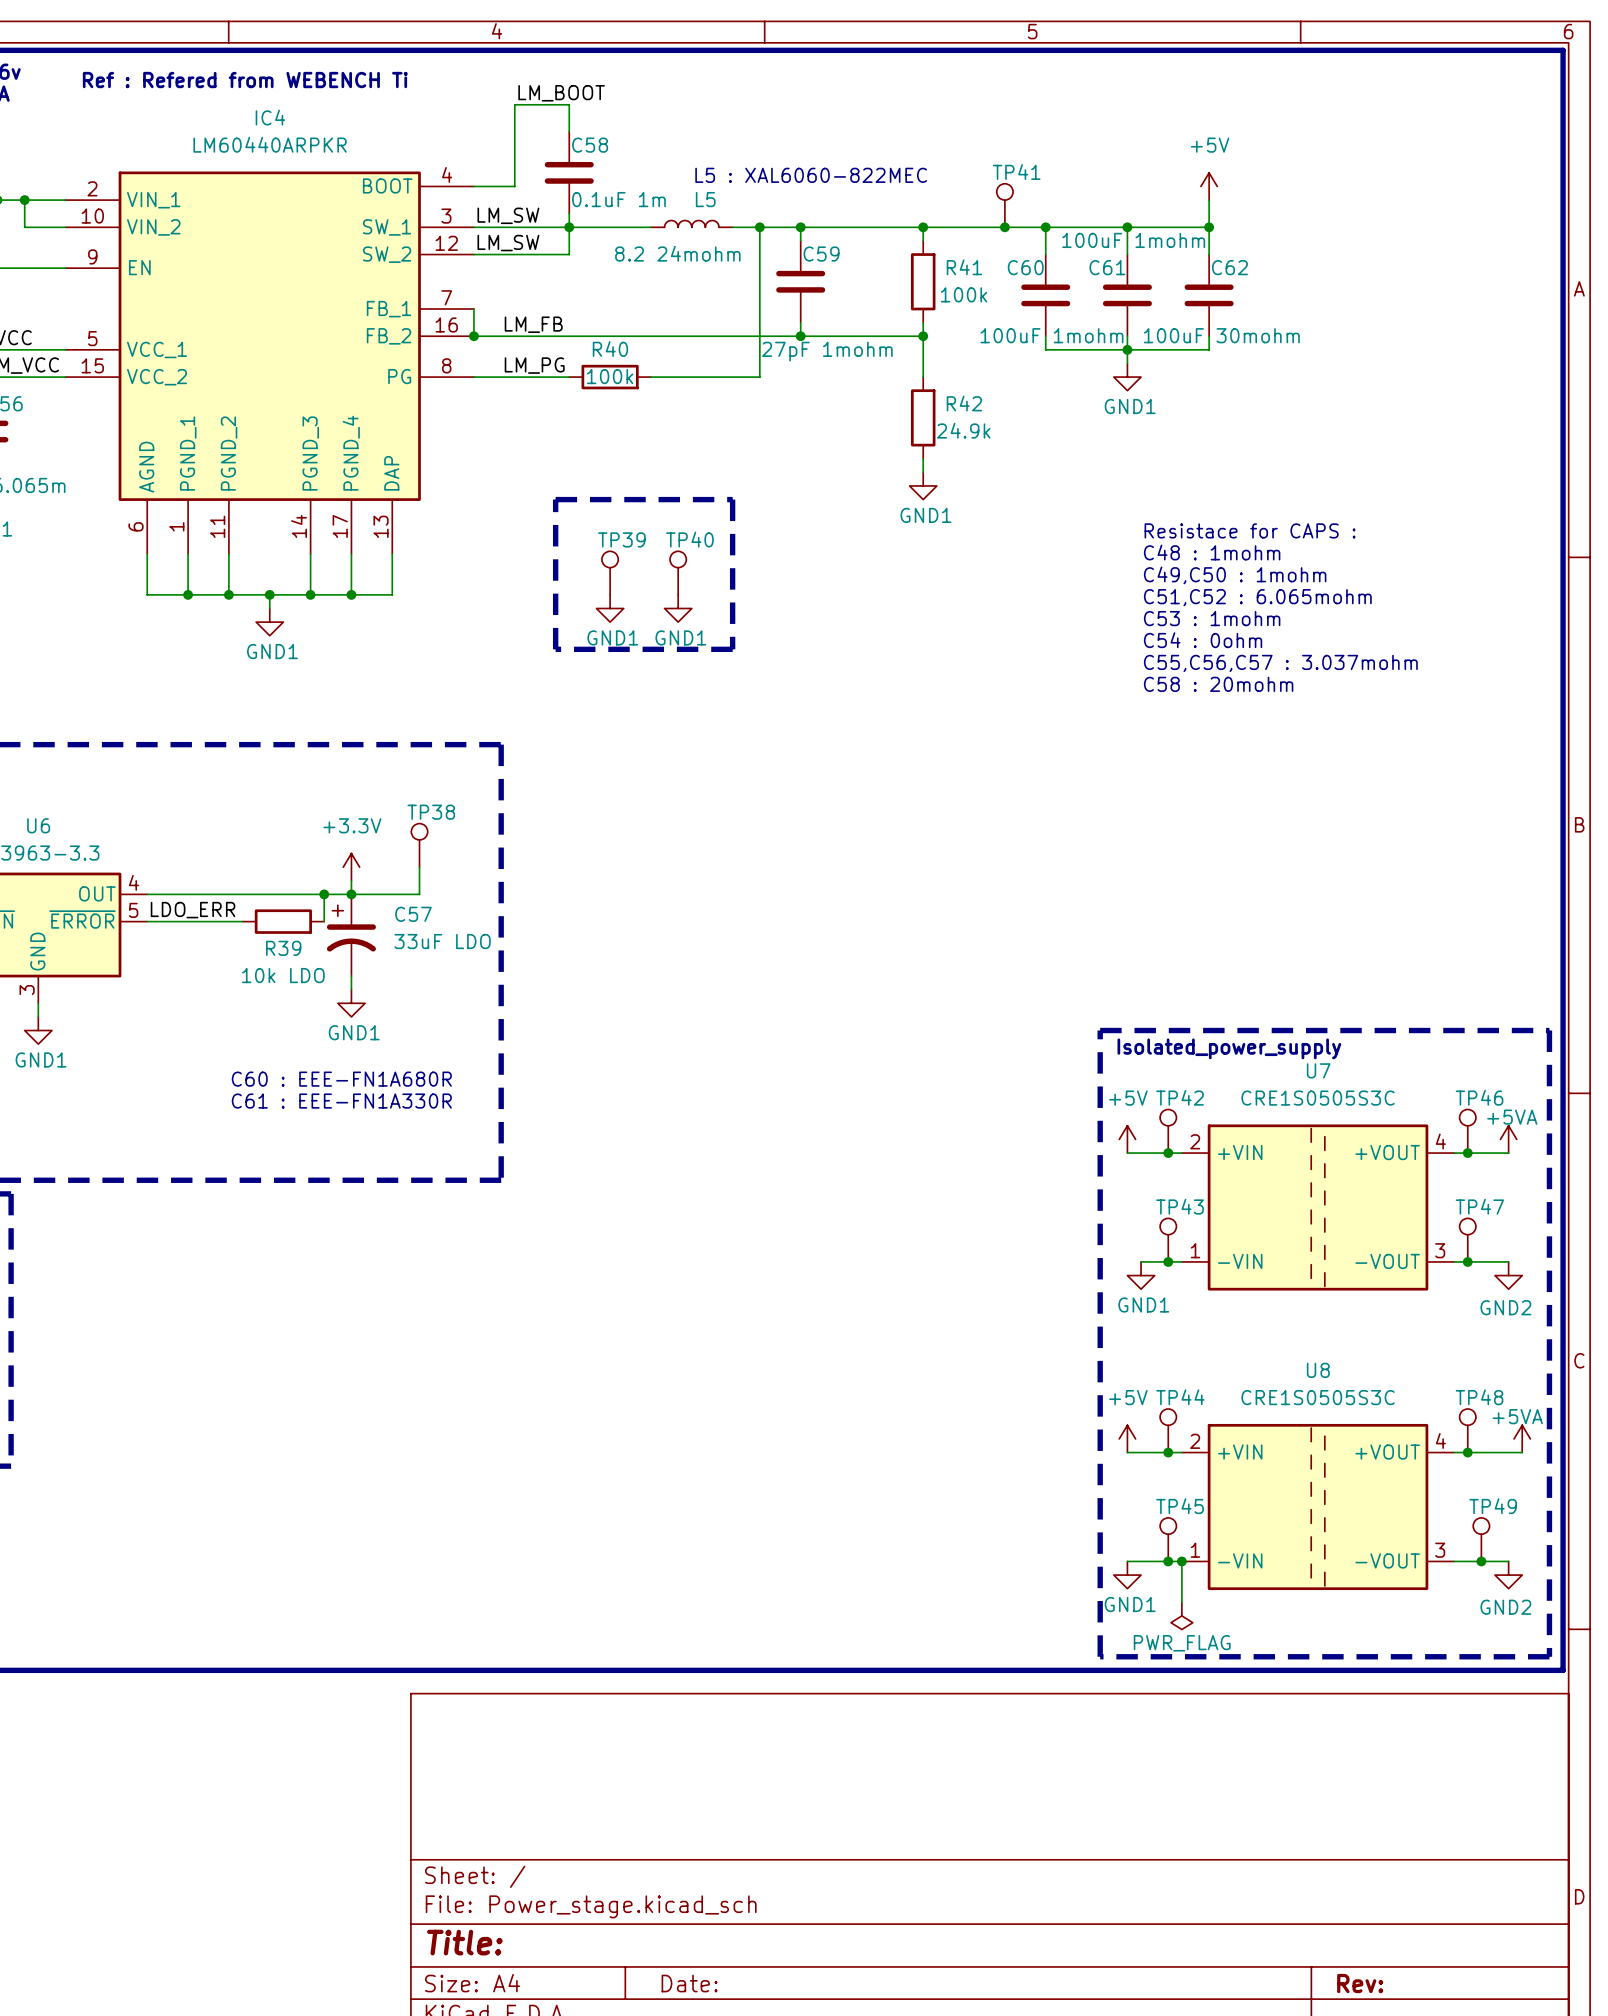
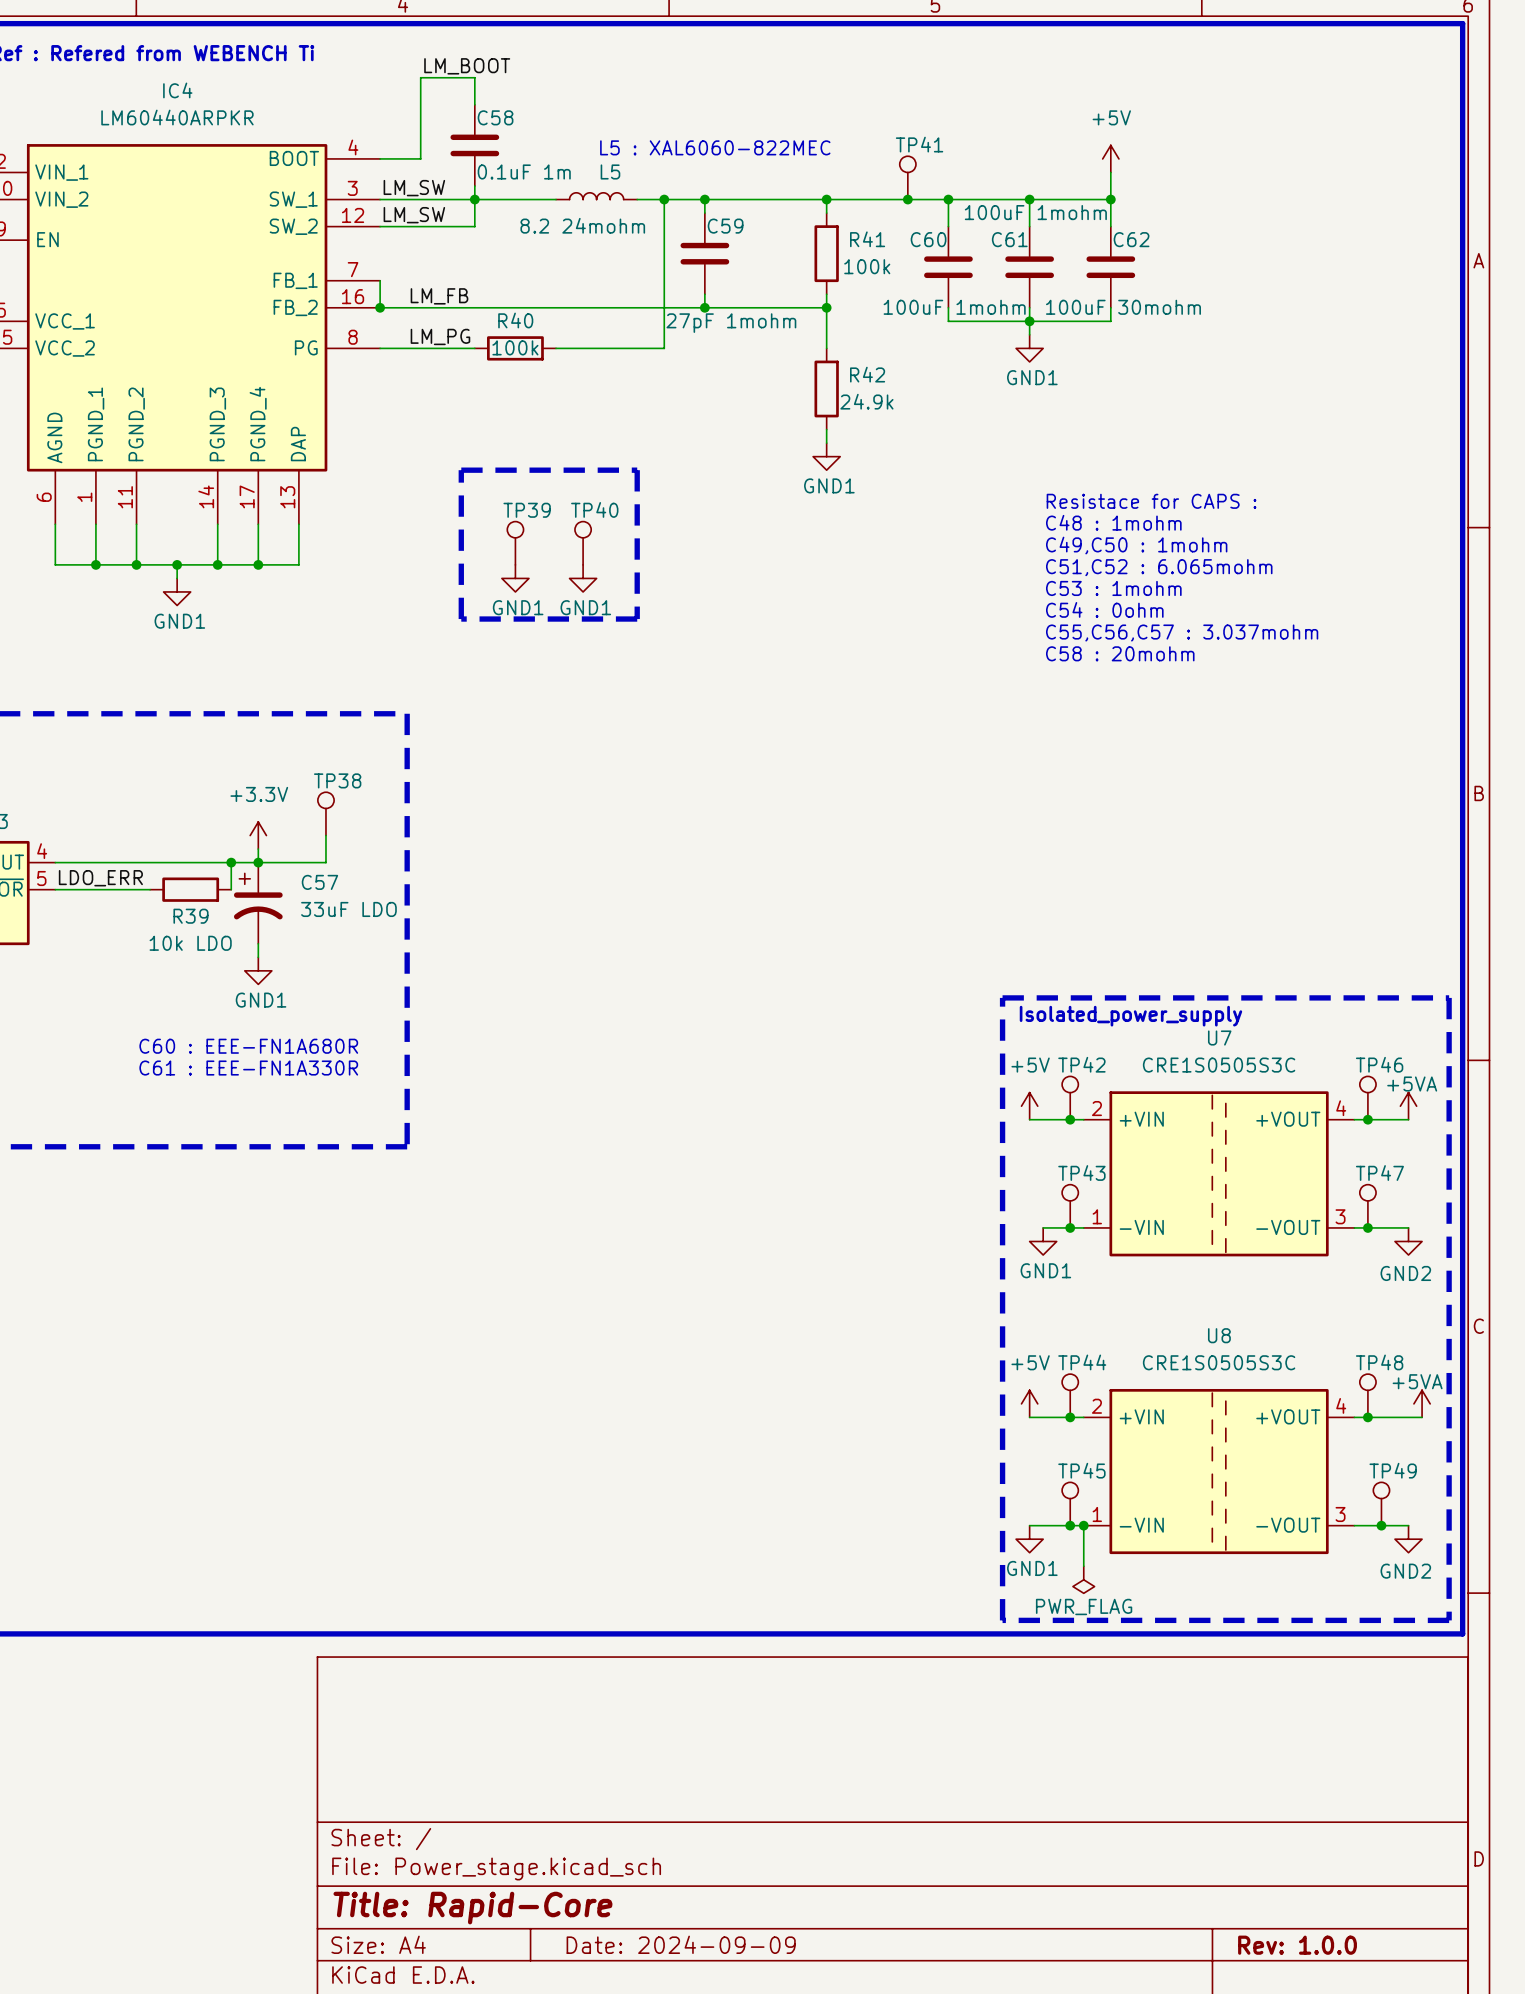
title block: Title: (464, 1942) -> Title: Rapid-Core (472, 1908)
title block: Date: (689, 1983) -> Date: 2024-09-09 (681, 1944)
title block: Rev: (1360, 1983) -> Rev: 1.0.0 (1297, 1945)

